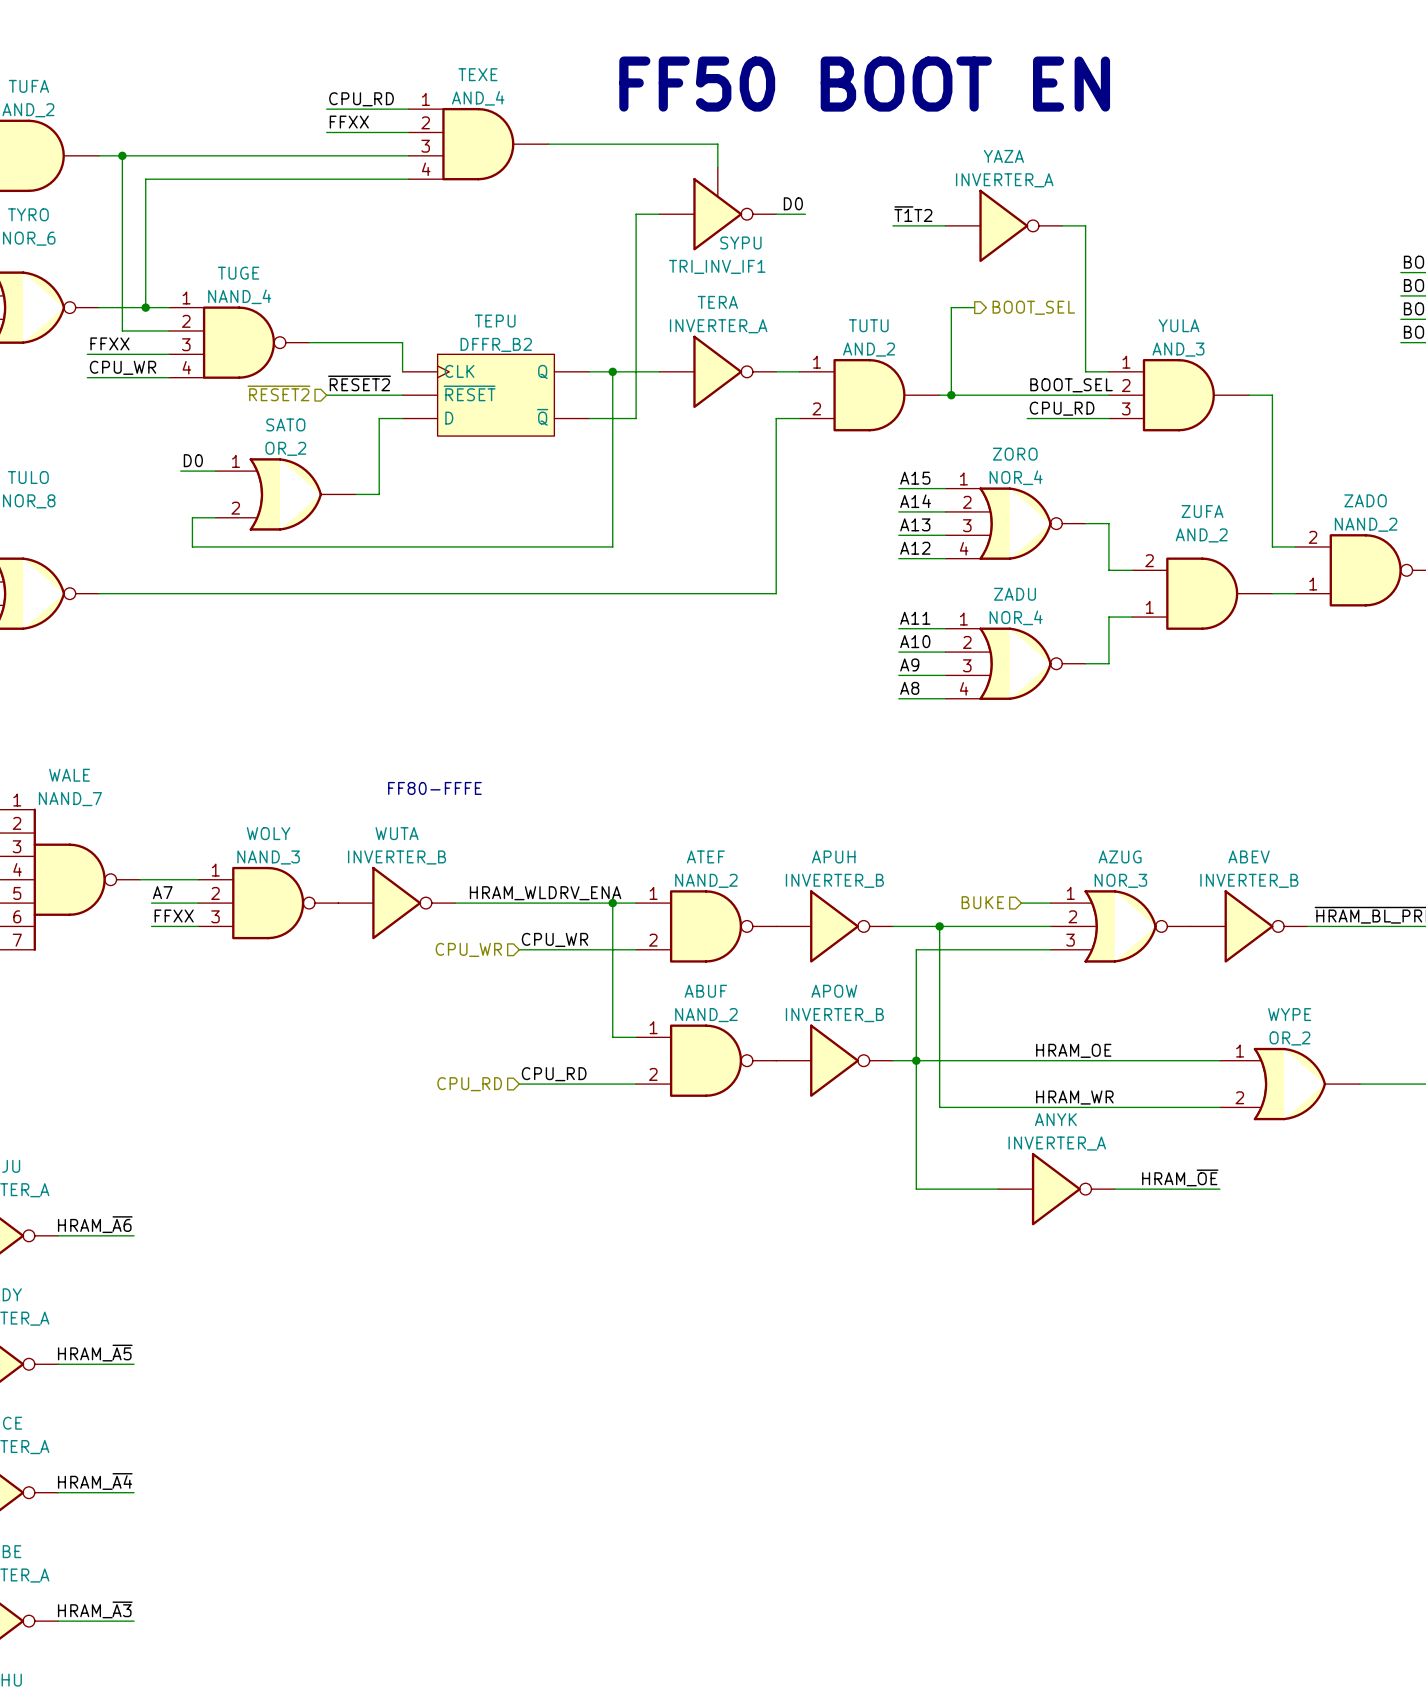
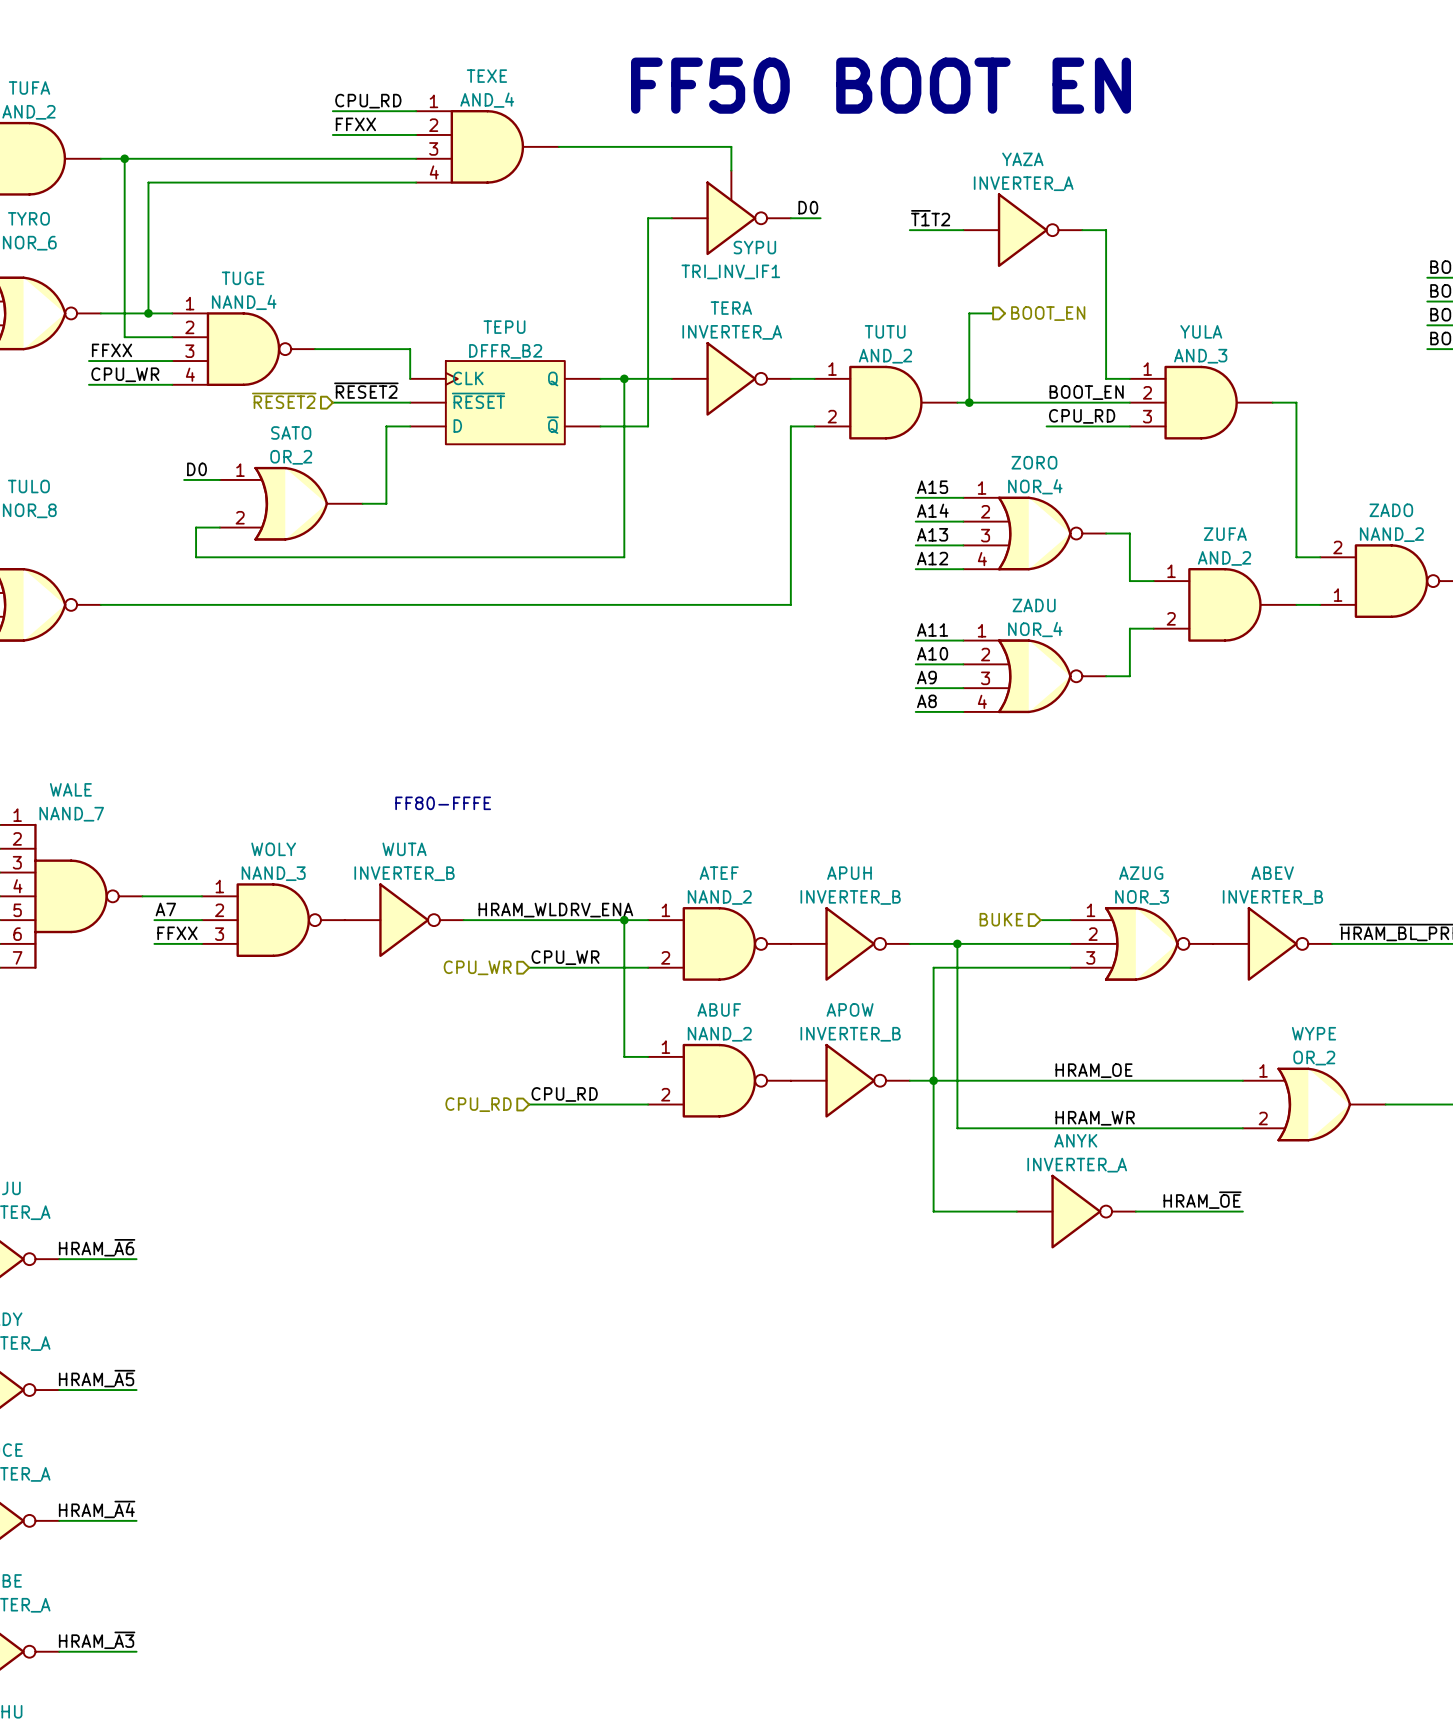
hierarchical label: BOOT_SEL (1033, 307) -> BOOT_EN (1048, 313)
label: BOOT_SEL (1071, 385) -> BOOT_EN (1086, 392)
ZUFA flip: as is (1202, 593) -> up-down (1224, 604)

